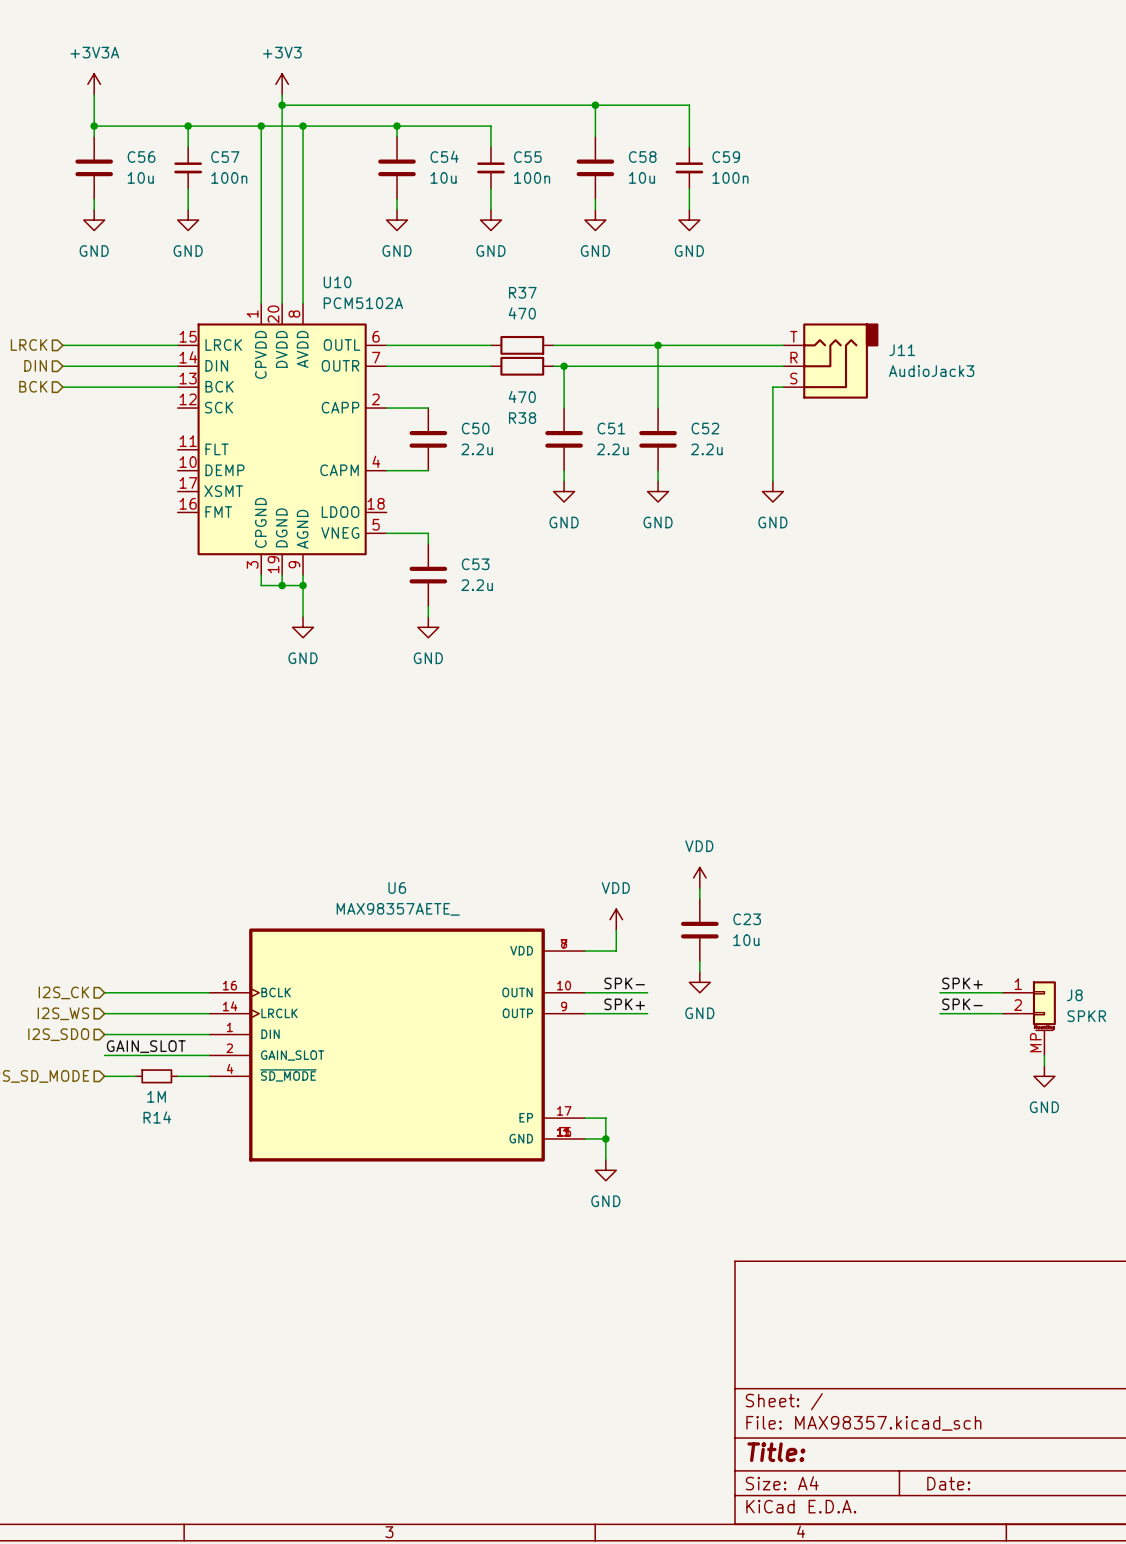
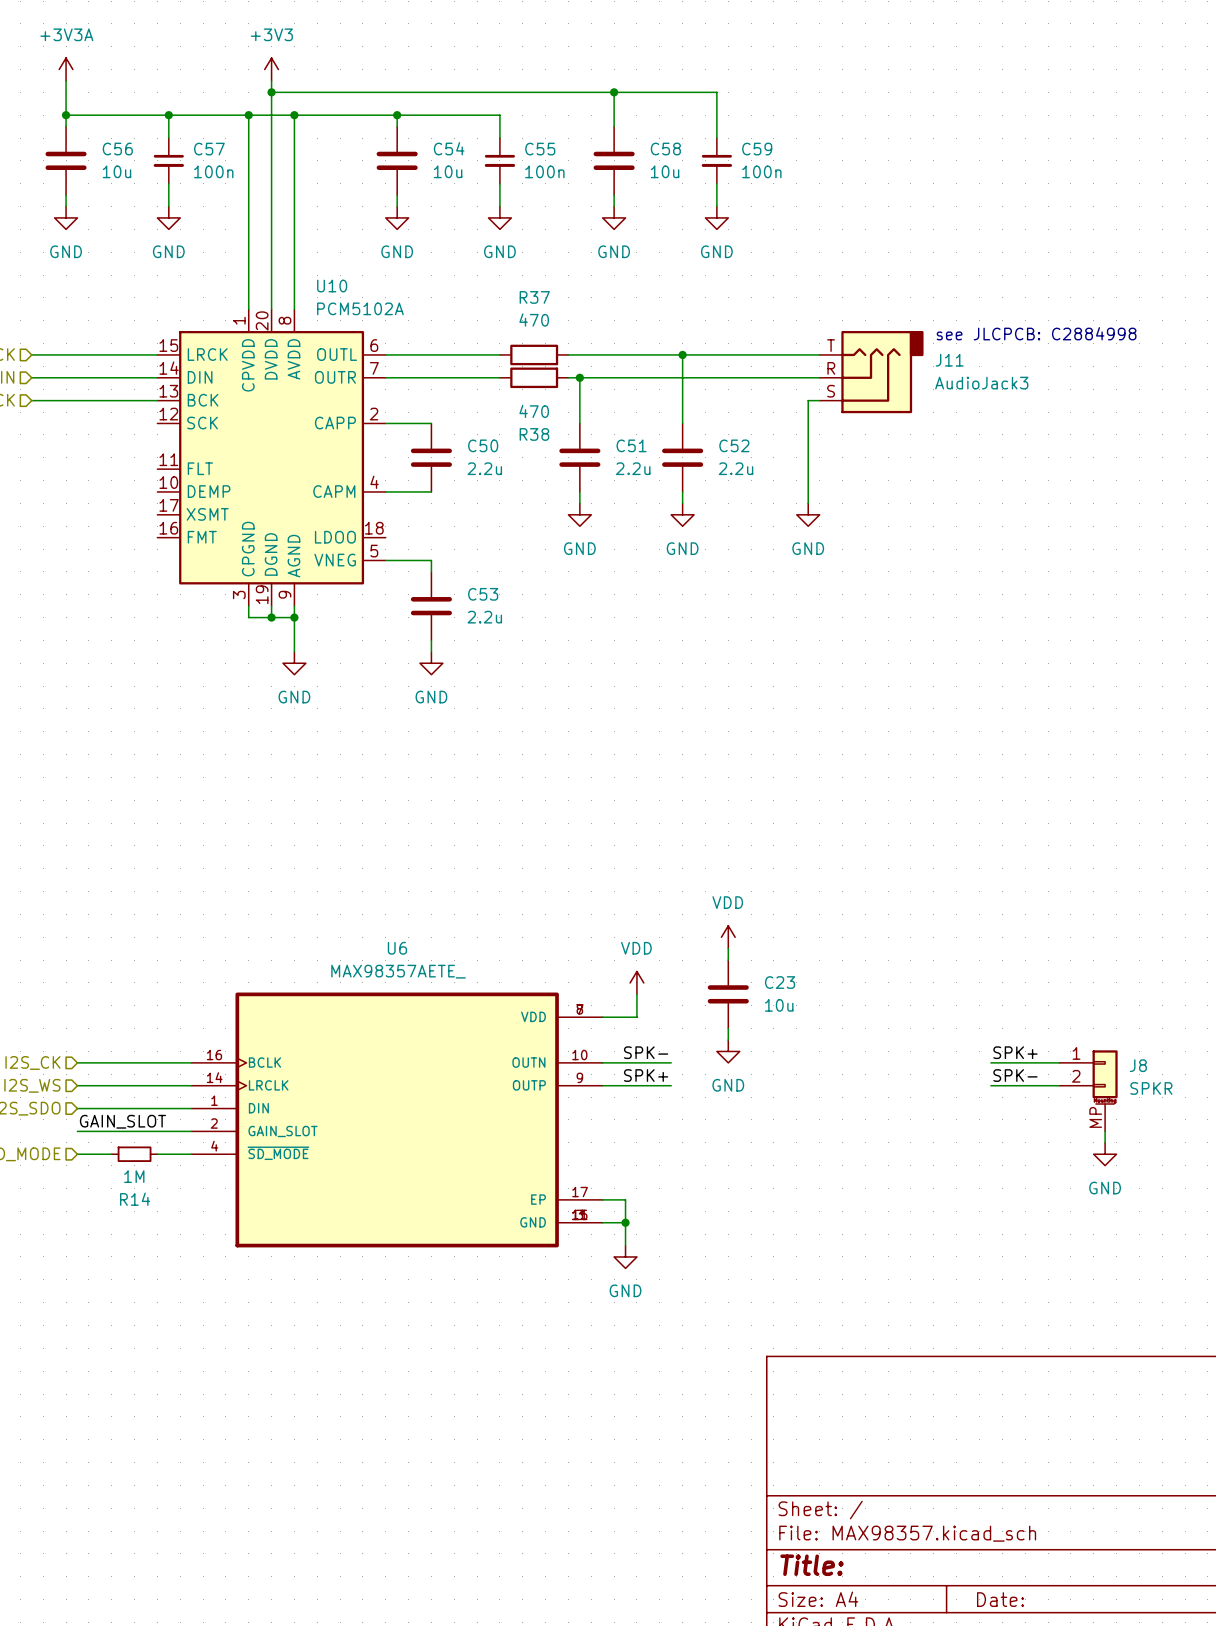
text: none -> see JLCPCB: C2884998 (1036, 333)

